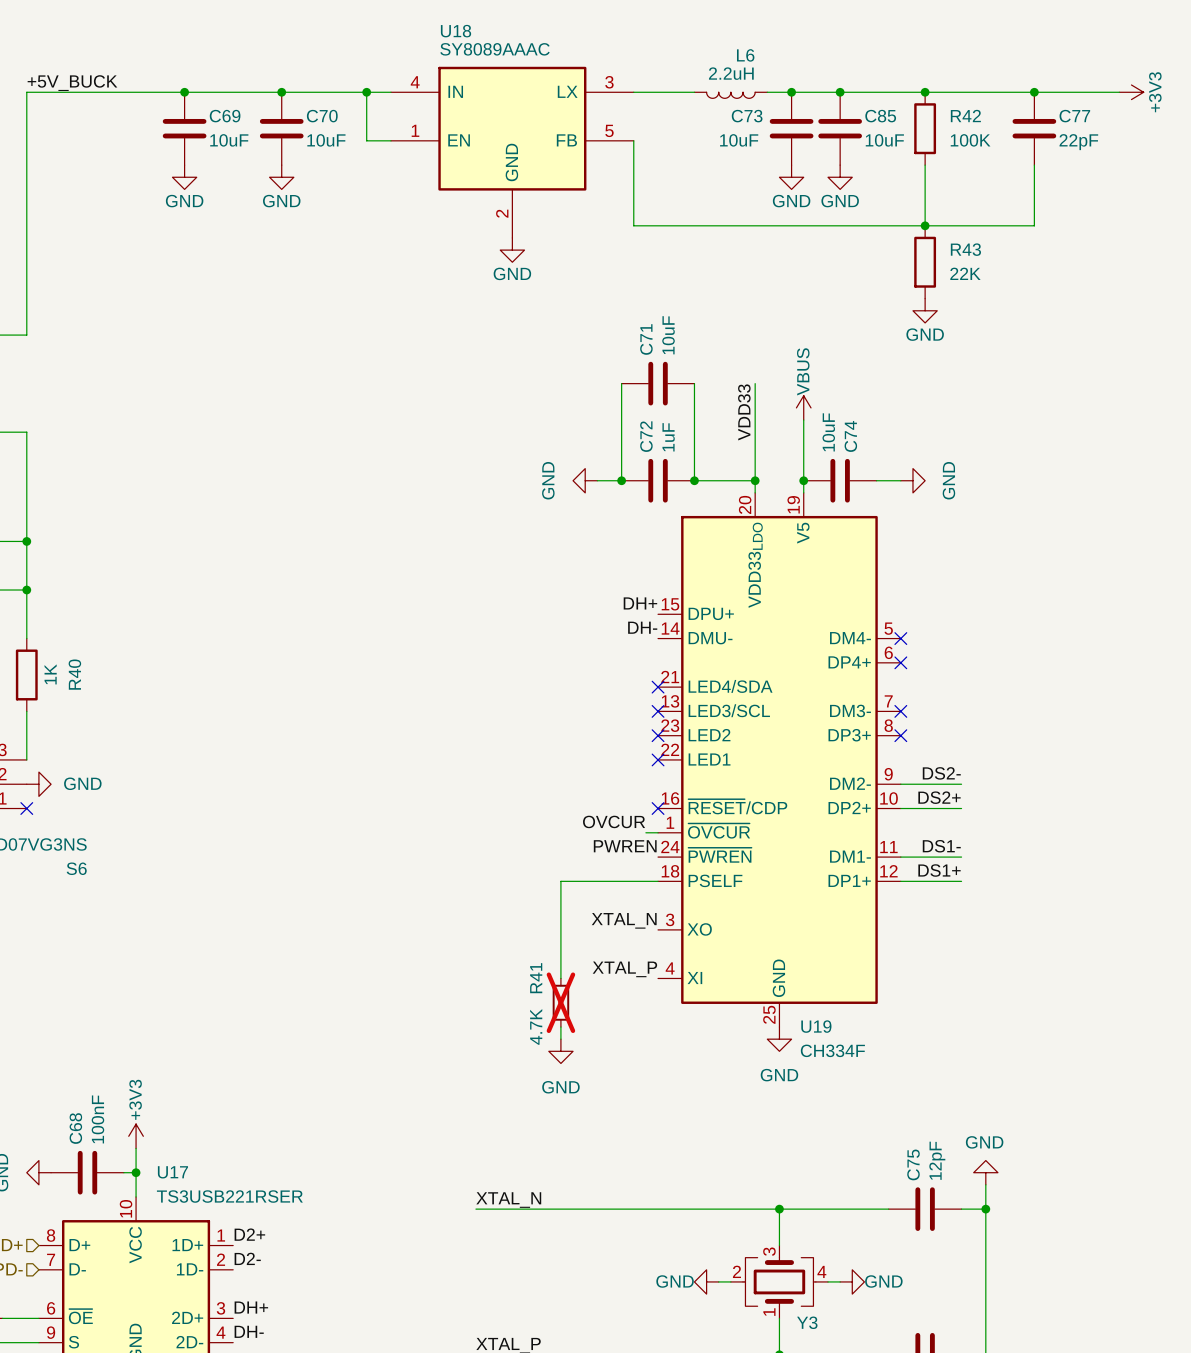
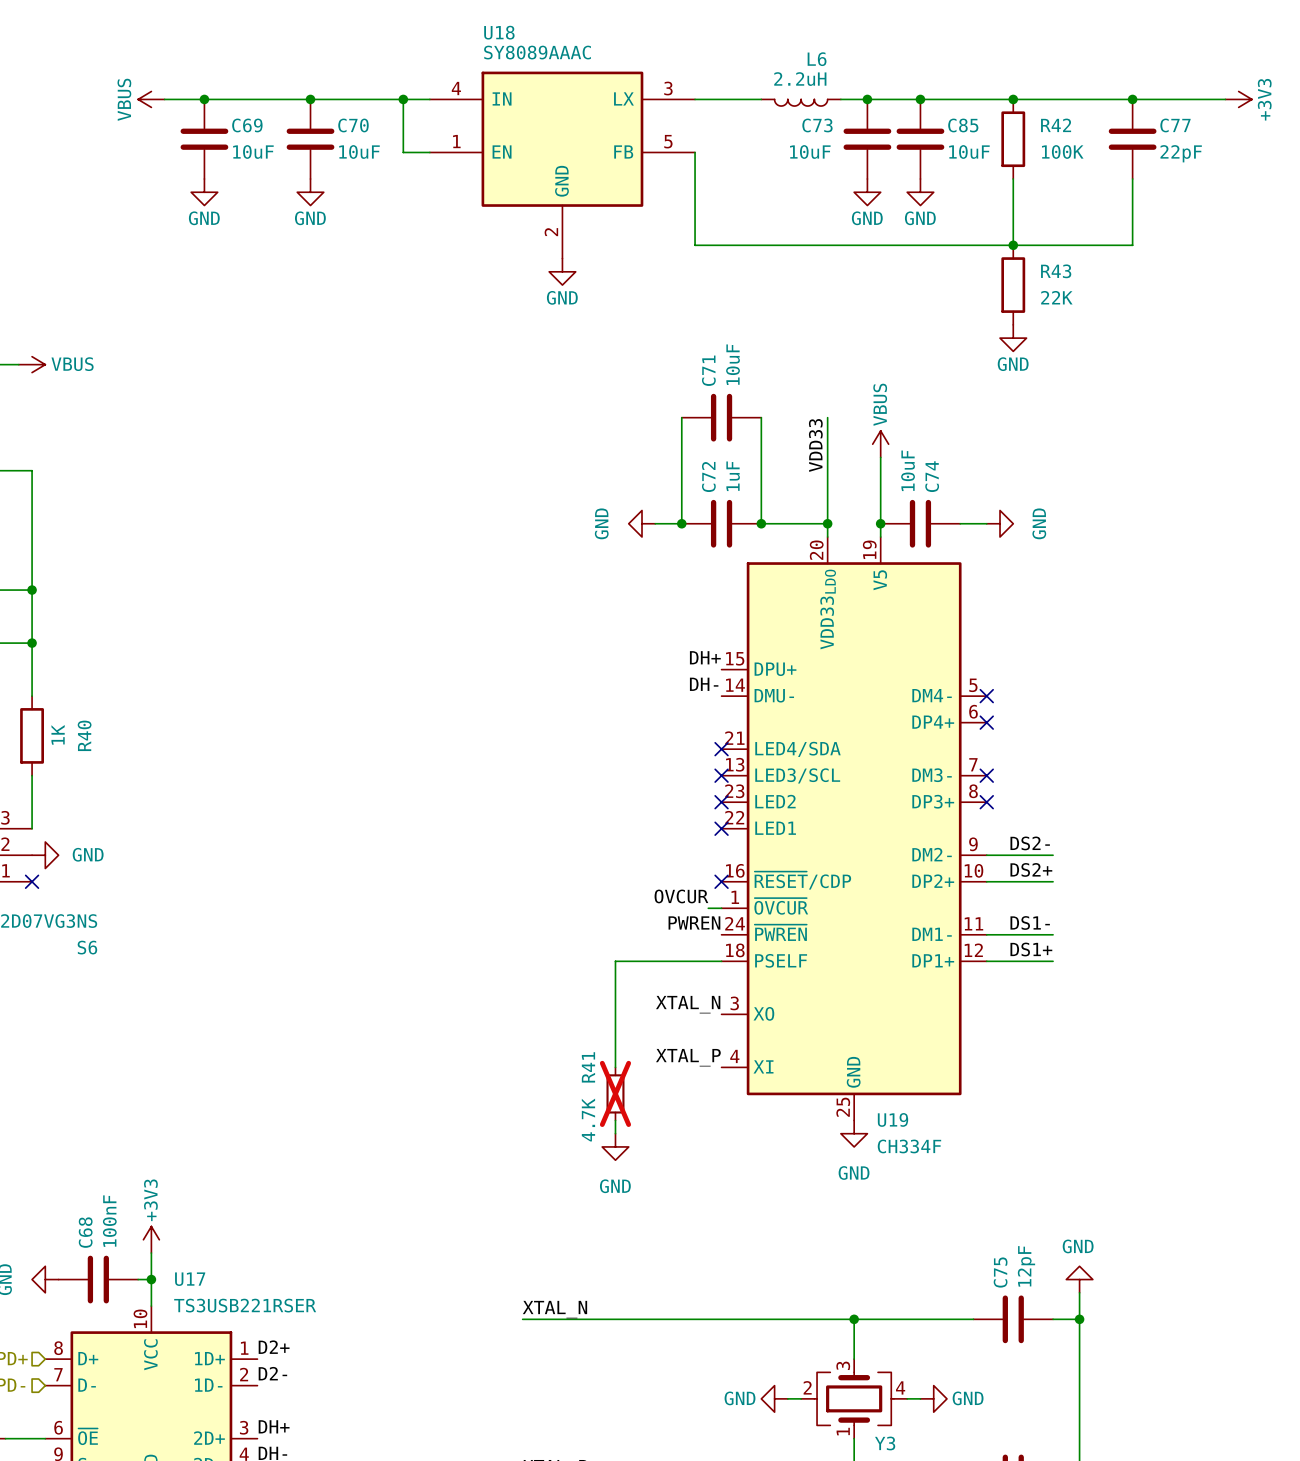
label: +5V_BUCK (72, 83) -> none
power symbol: none -> VBUS (151, 99)
wire: (148, 92) (26, 92) (26, 335) (14, 335) -> none
power symbol: none -> VBUS (32, 364)

